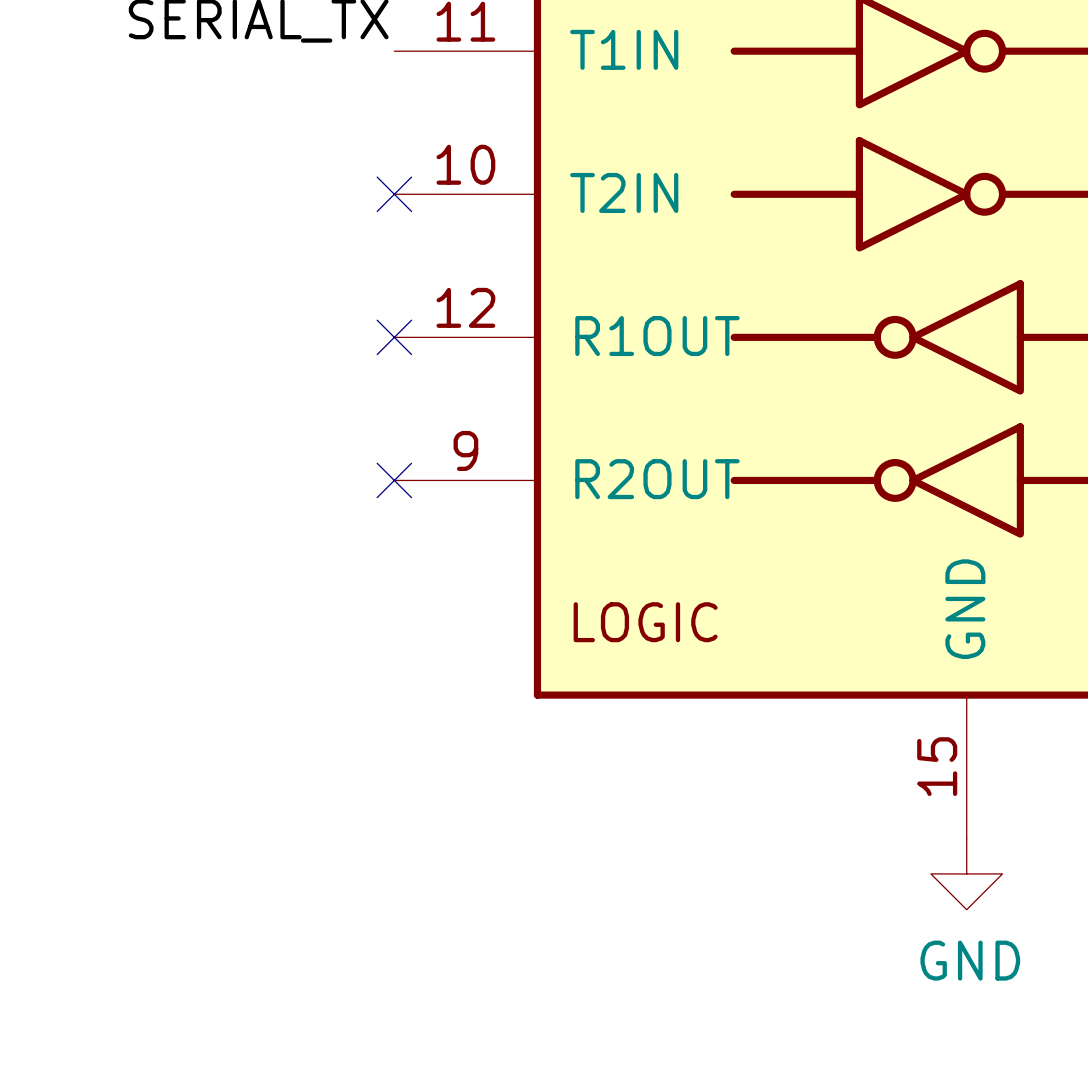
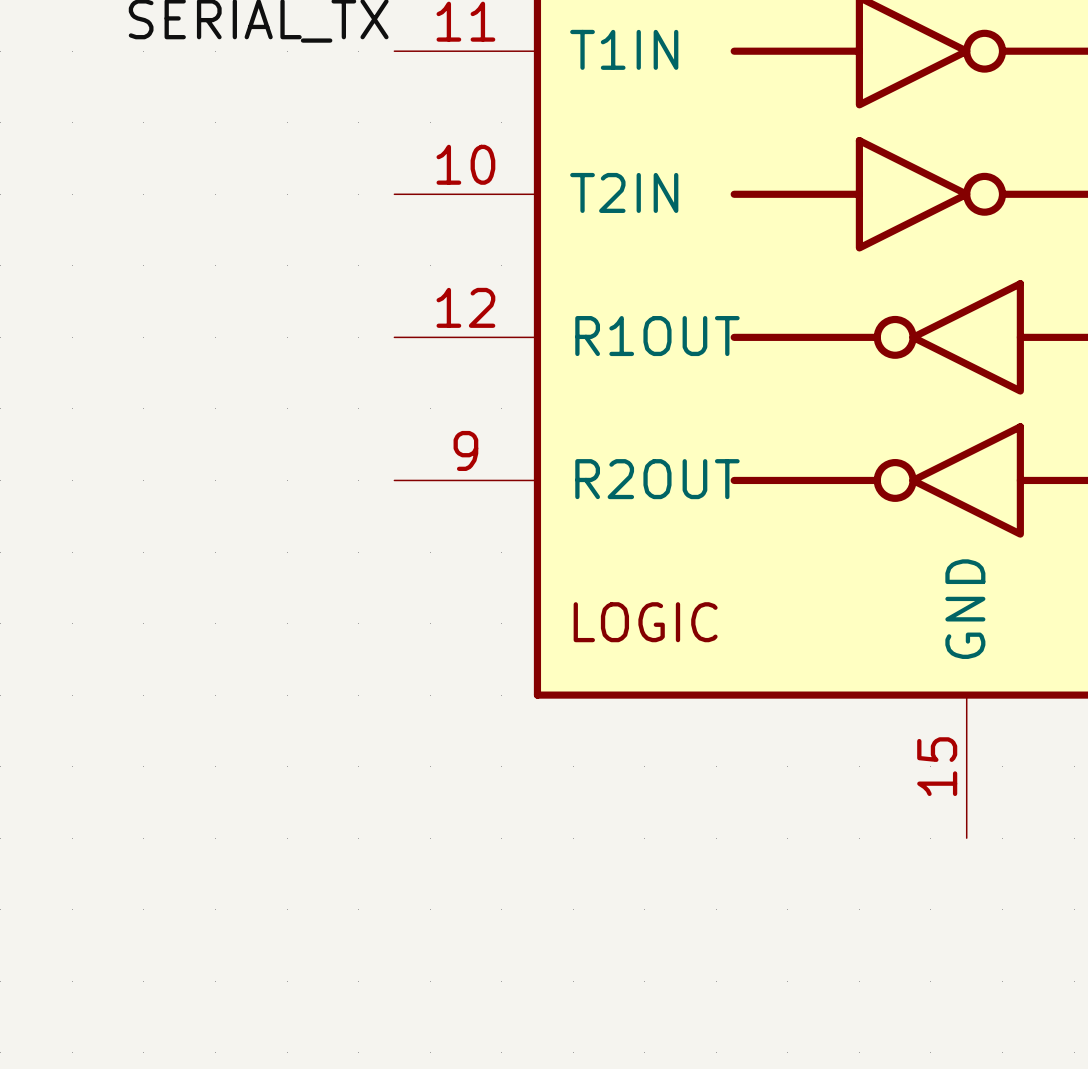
no-connect mark: (394, 194) -> none
no-connect mark: (394, 337) -> none
no-connect mark: (394, 480) -> none
power symbol: GND (966, 873) -> none

